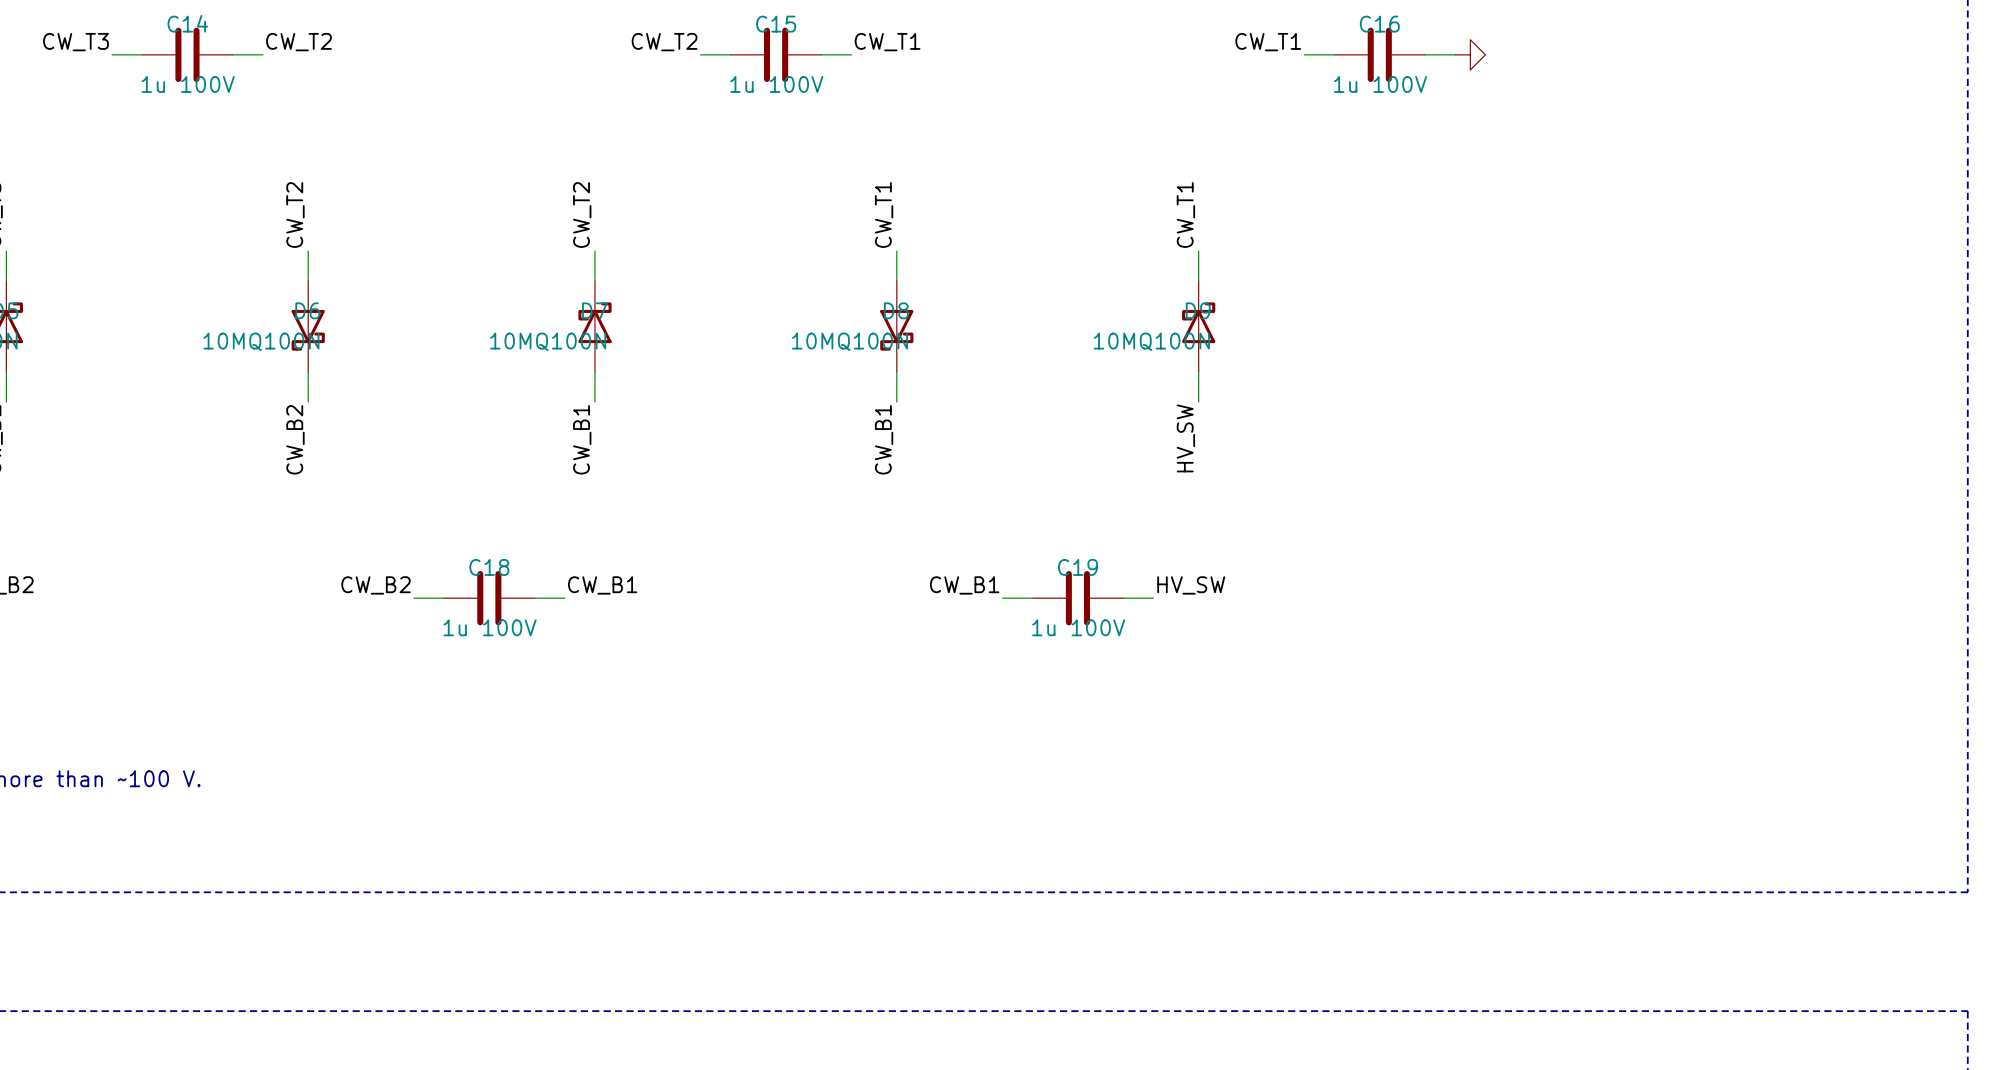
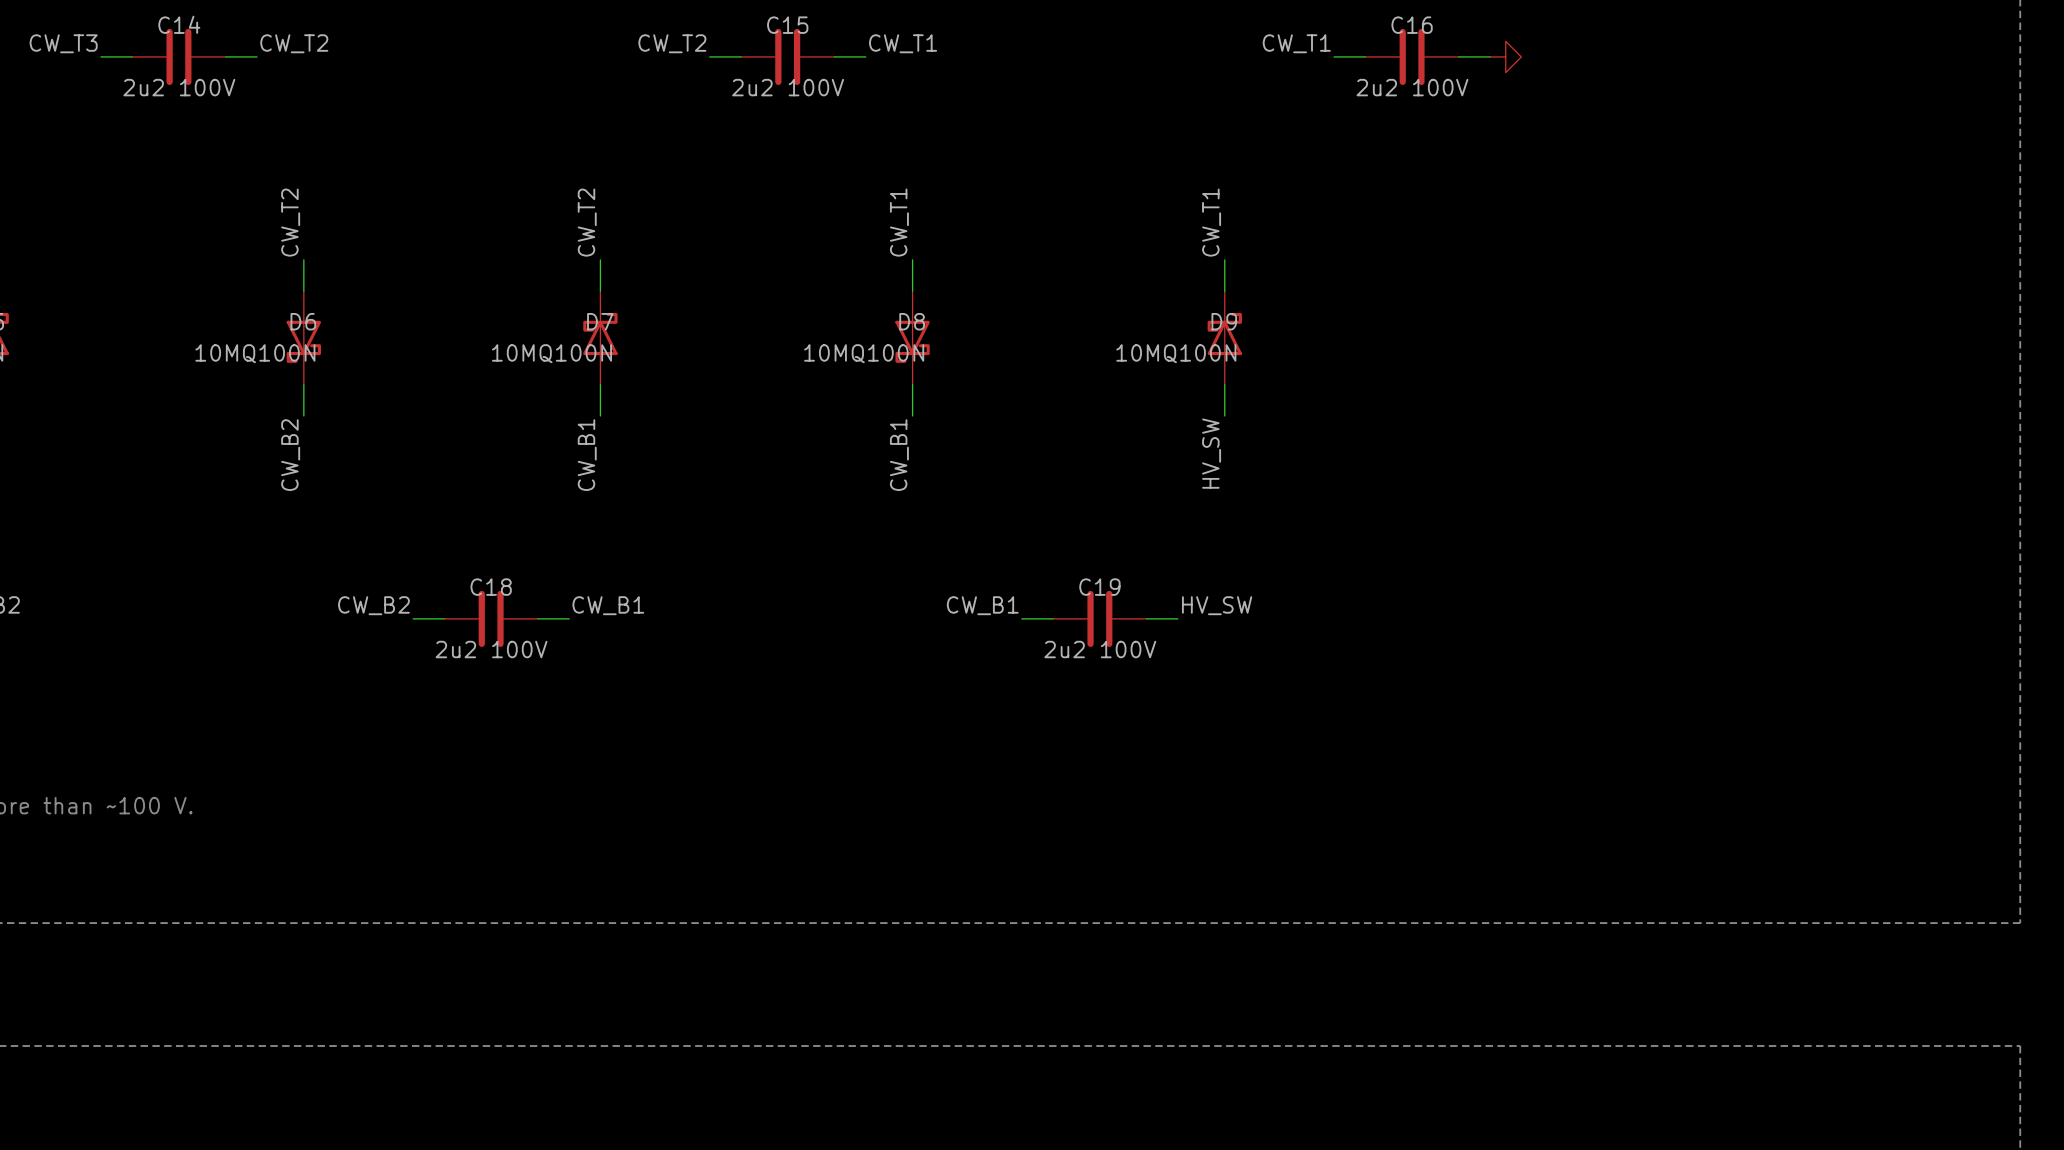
C14 value: 1u 100V (188, 84) -> 2u2 100V (179, 87)
C15 value: 1u 100V (776, 84) -> 2u2 100V (788, 87)
C16 value: 1u 100V (1380, 84) -> 2u2 100V (1412, 87)
C18 value: 1u 100V (490, 627) -> 2u2 100V (491, 649)
C19 value: 1u 100V (1078, 627) -> 2u2 100V (1100, 649)

